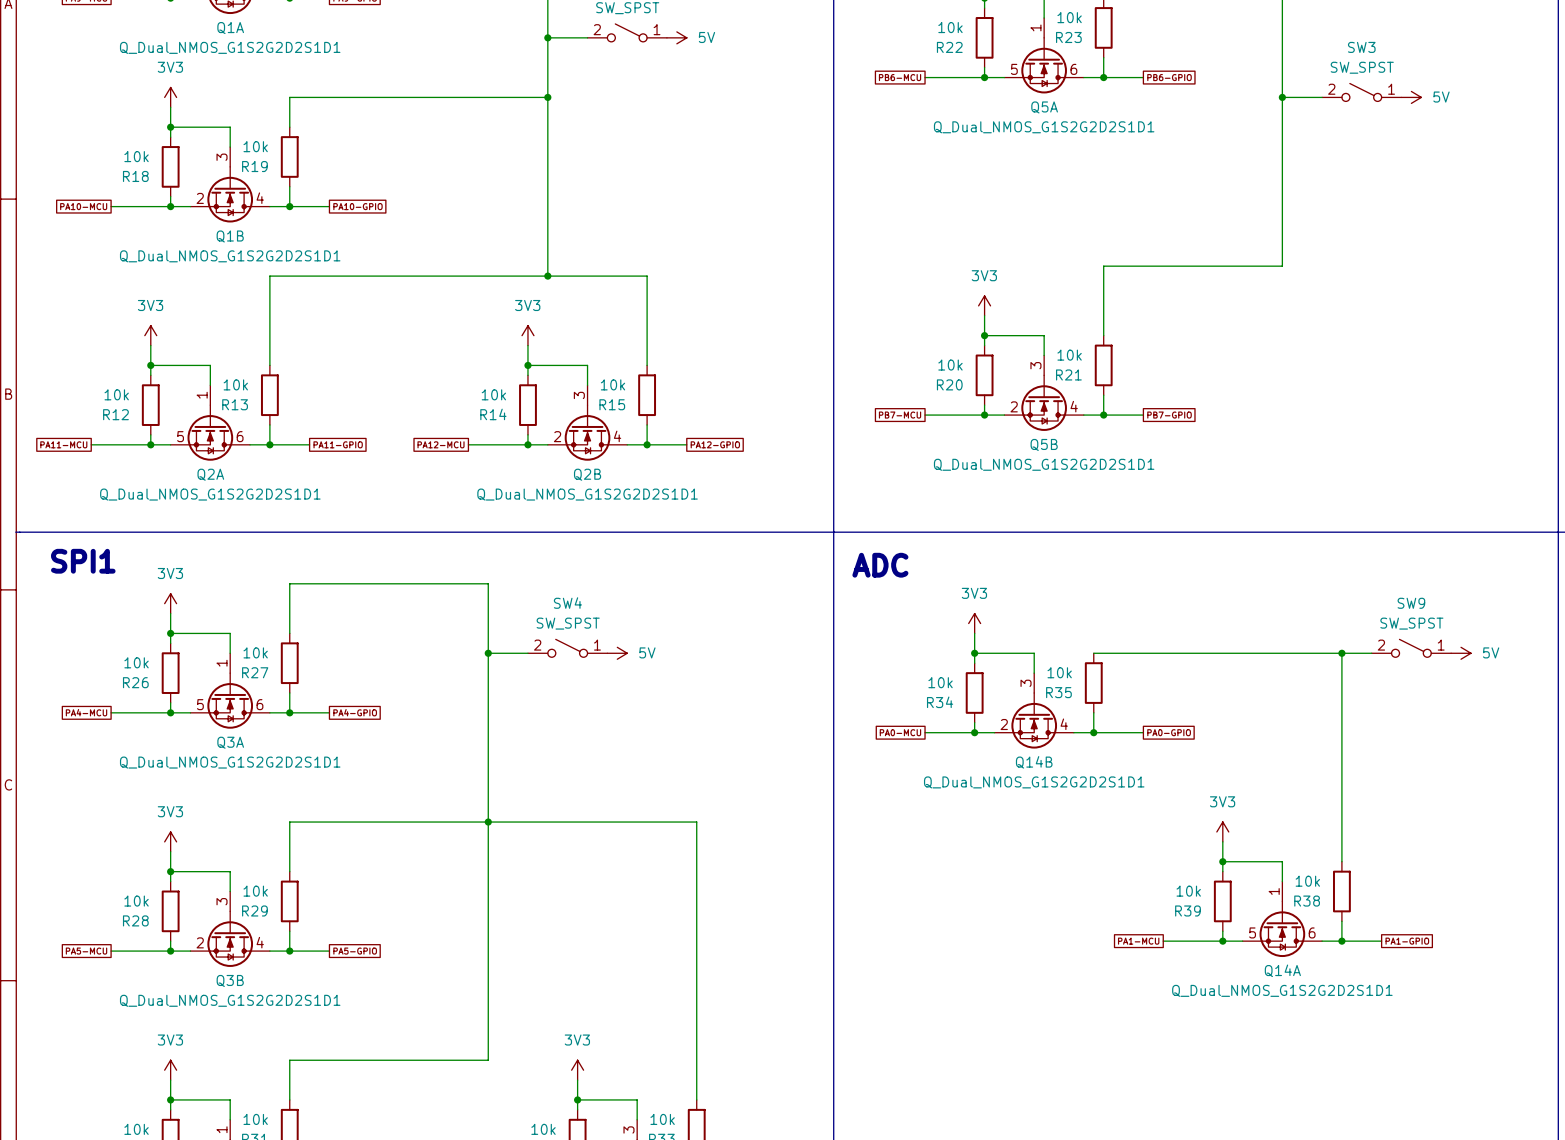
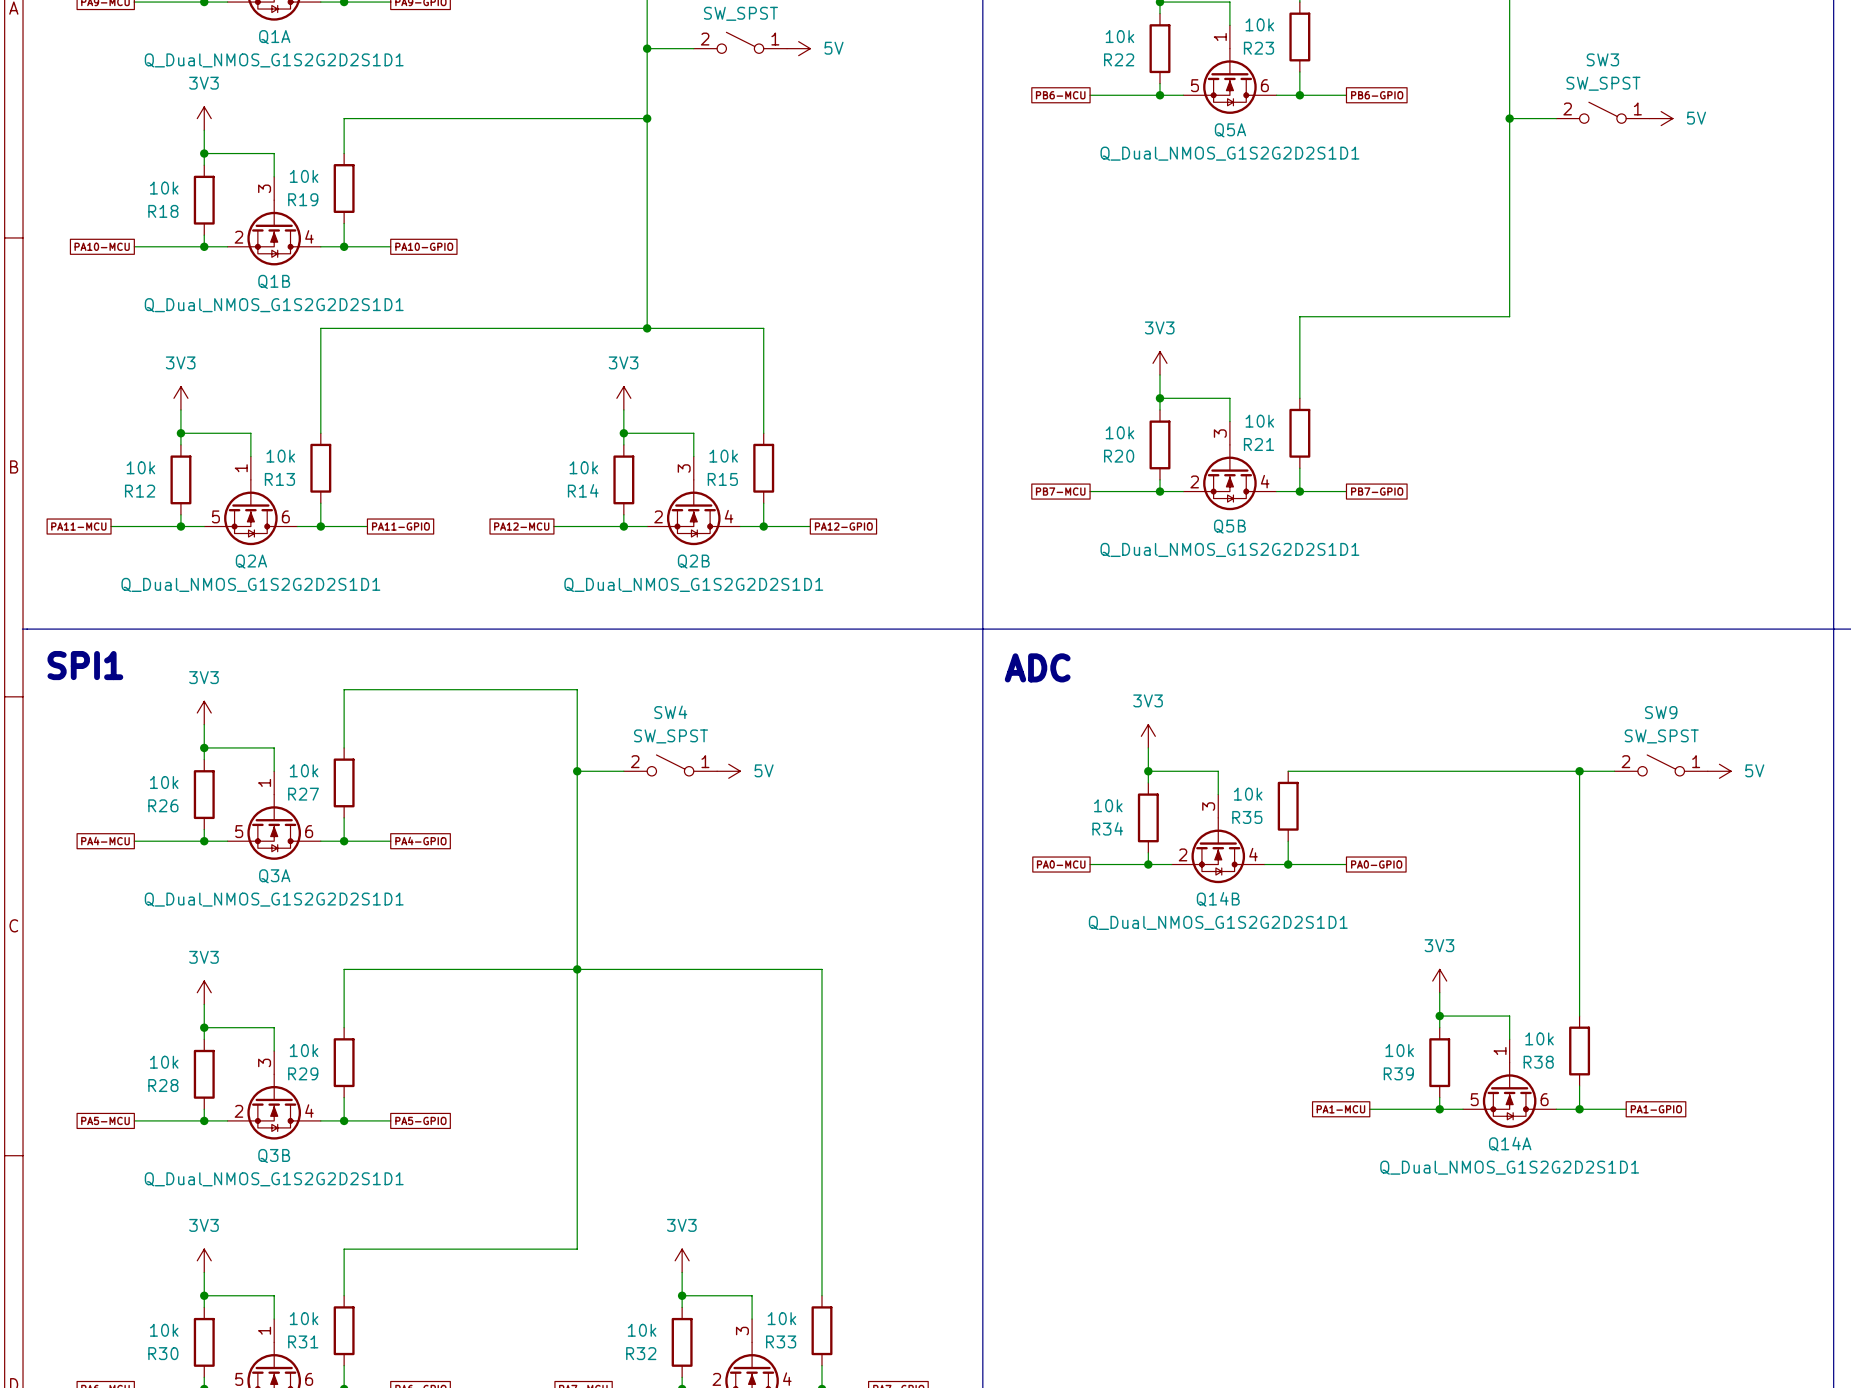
text position: SPI1 (83, 561) -> SPI1 (85, 665)

